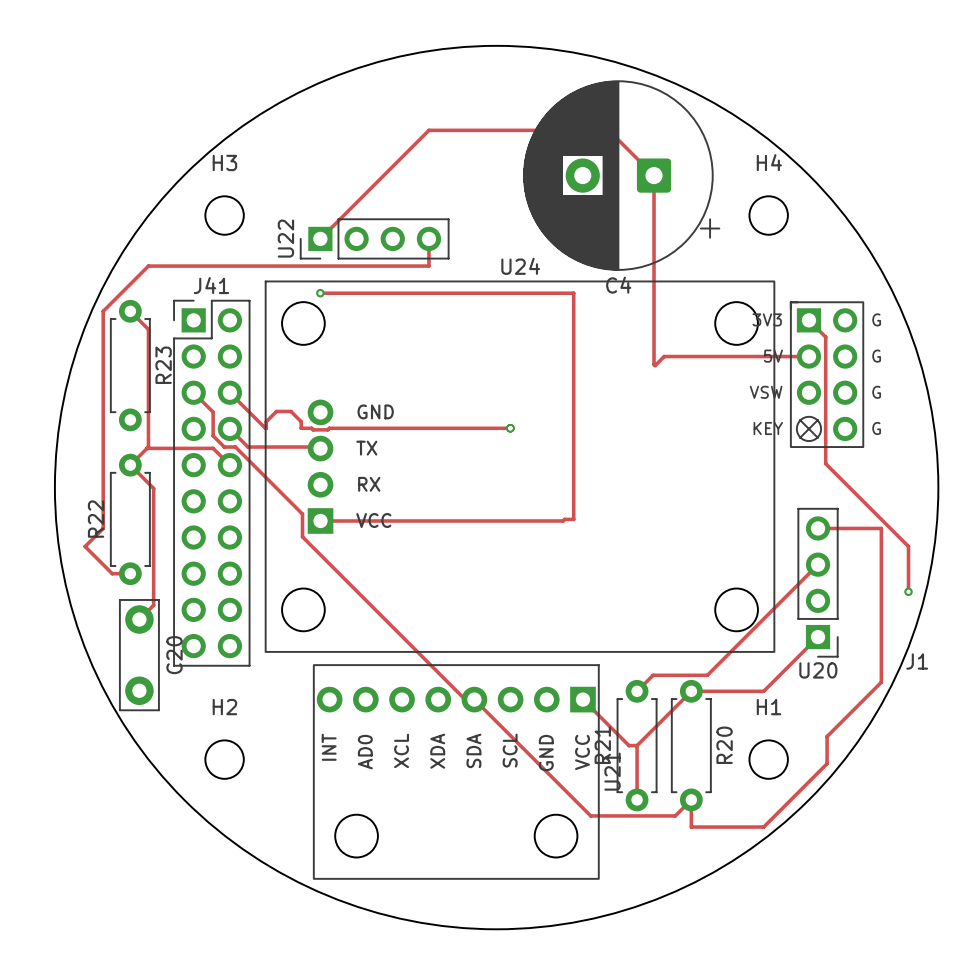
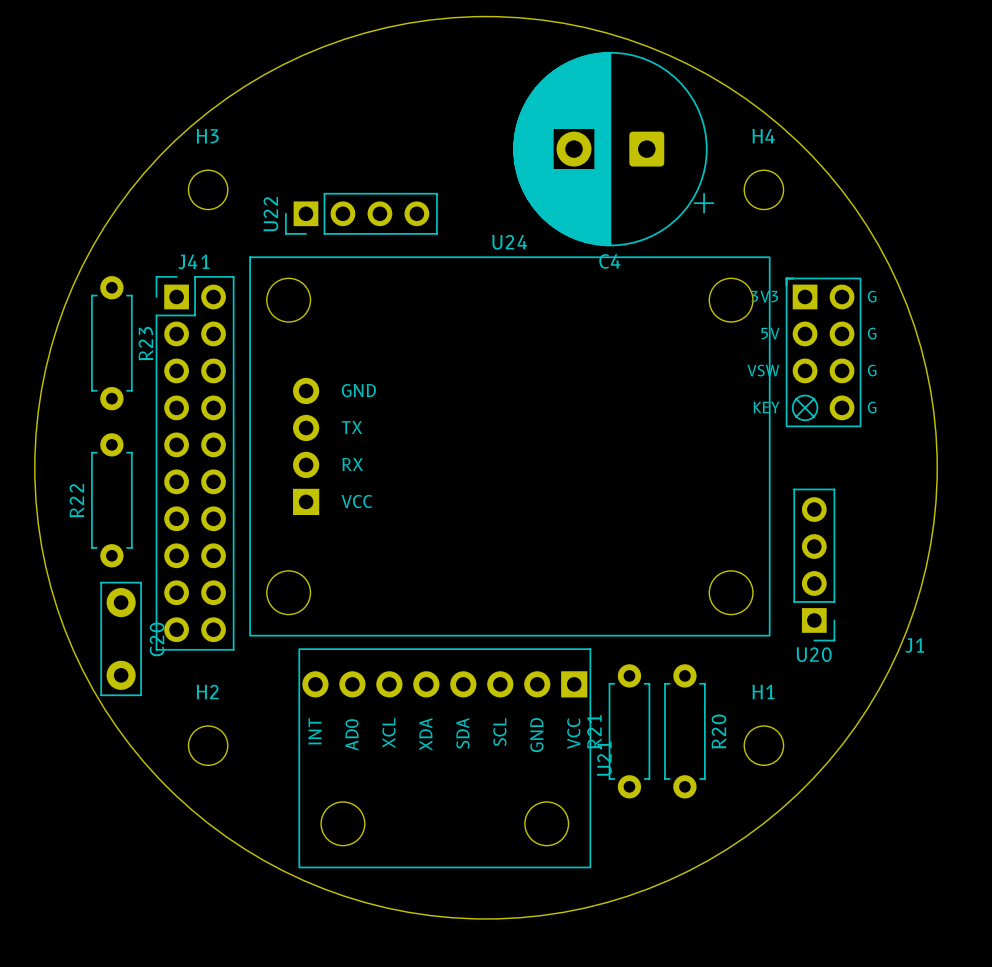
track: (320, 238) (428, 130) (608, 130) (654, 175) (654, 364) (655, 365) (664, 356) (808, 356) -> none
track: (428, 238) (428, 266) (148, 266) (103, 311) (103, 528) (85, 546) (112, 573) (130, 573) -> none
track: (320, 293) (573, 293) (573, 519) (563, 520) (320, 520) -> none
via: (320, 293) -> none
track: (130, 311) (148, 329) (148, 447) (130, 465) (153, 488) (153, 605) (139, 619) -> none
track: (808, 320) (825, 337) (825, 463) (908, 546) (908, 591) -> none
track: (193, 392) (213, 412) (213, 435) (224, 447) (235, 447) (302, 514) (302, 536) (465, 699) -> none
track: (229, 392) (265, 428) (266, 421) (276, 411) (290, 411) (301, 421) (301, 428) (313, 429) (510, 428) -> none
track: (229, 428) (247, 447) (319, 447) -> none
via: (510, 428) -> none
track: (147, 448) (213, 448) (229, 465) -> none
track: (818, 528) (881, 528) (881, 682) (827, 736) (827, 763) (763, 827) (691, 827) (691, 799) (675, 815) (590, 815) (474, 699) -> none
track: (818, 564) (707, 675) (653, 675) (637, 691) -> none
via: (908, 591) -> none
track: (818, 637) (763, 691) (691, 691) (637, 745) -> none
track: (582, 699) (629, 745) (637, 745) -> none
track: (637, 745) (637, 799) -> none

